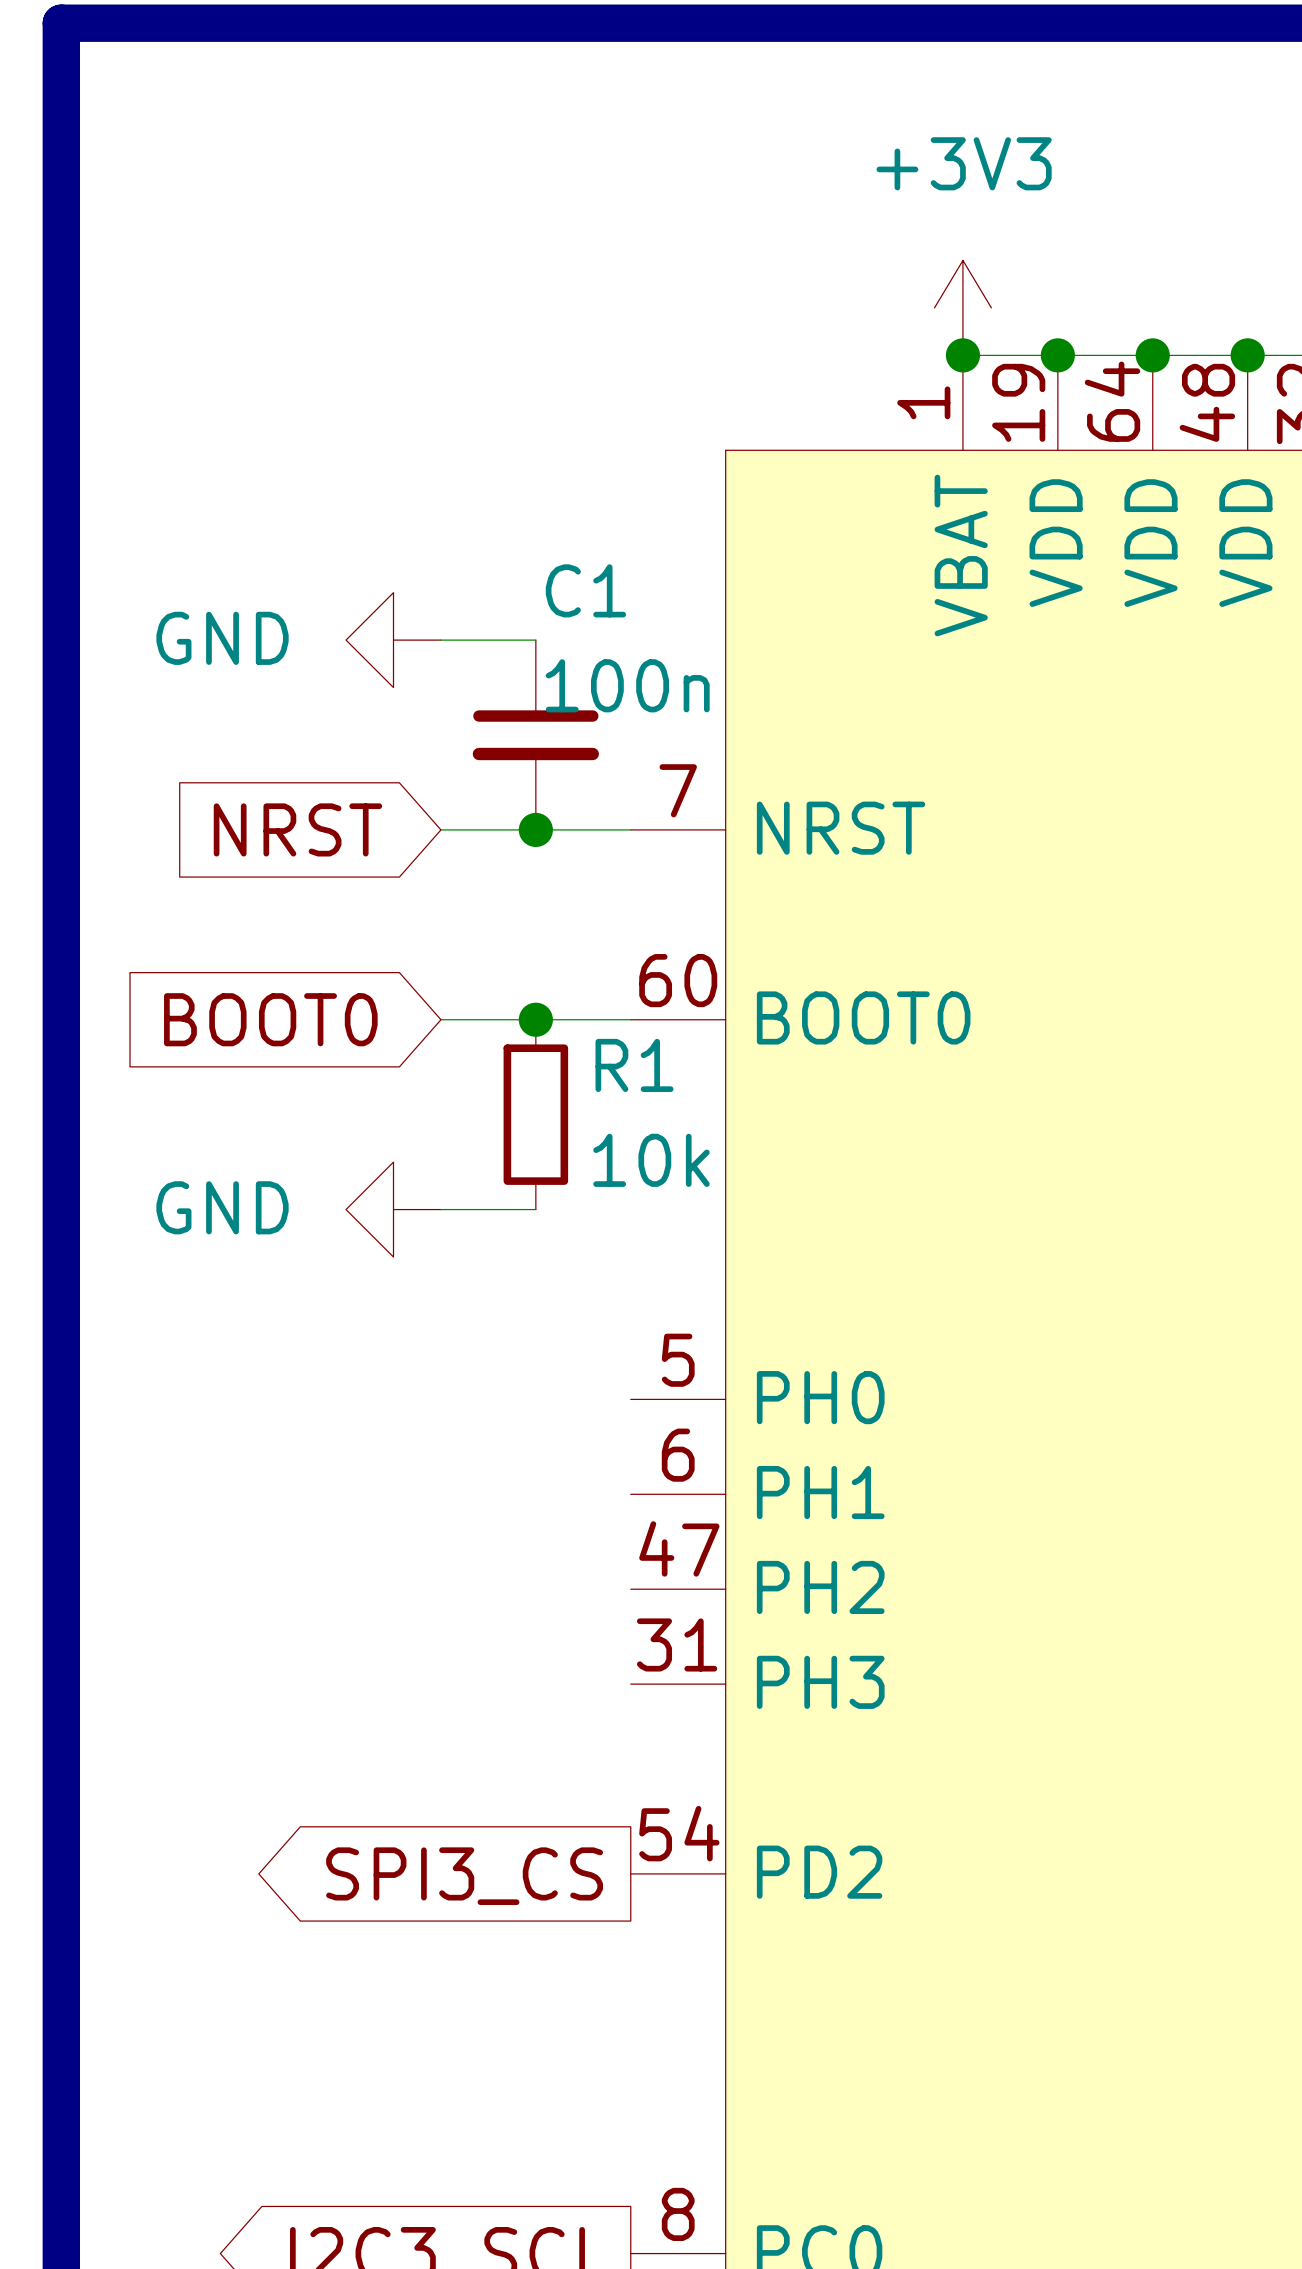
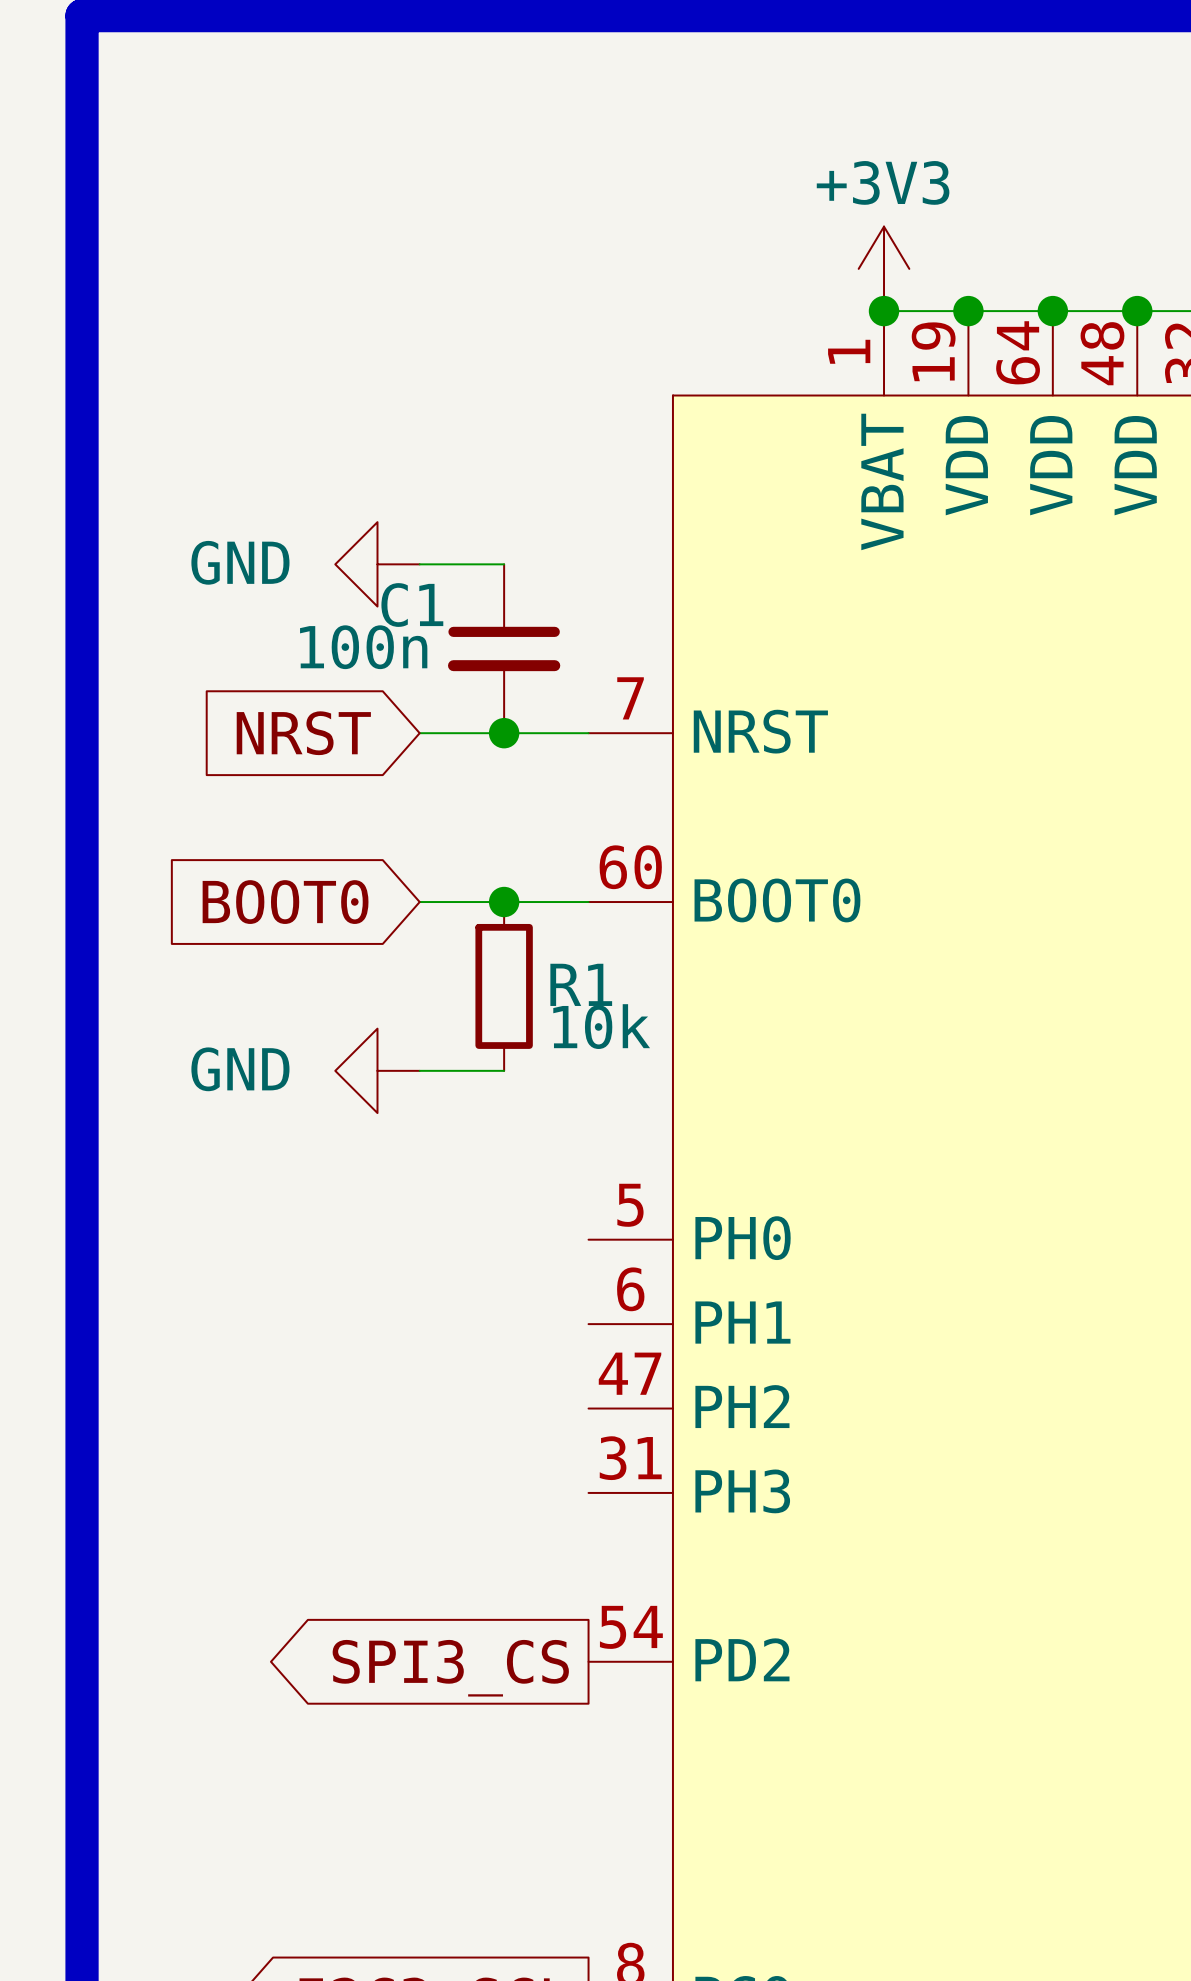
power symbol text position: +3V3 (964, 163) -> +3V3 (883, 182)
C1 name position: C1 (585, 590) -> C1 (412, 605)
C1 value position: 100n (627, 685) -> 100n (363, 647)
R1 name position: R1 (634, 1065) -> R1 (581, 984)

